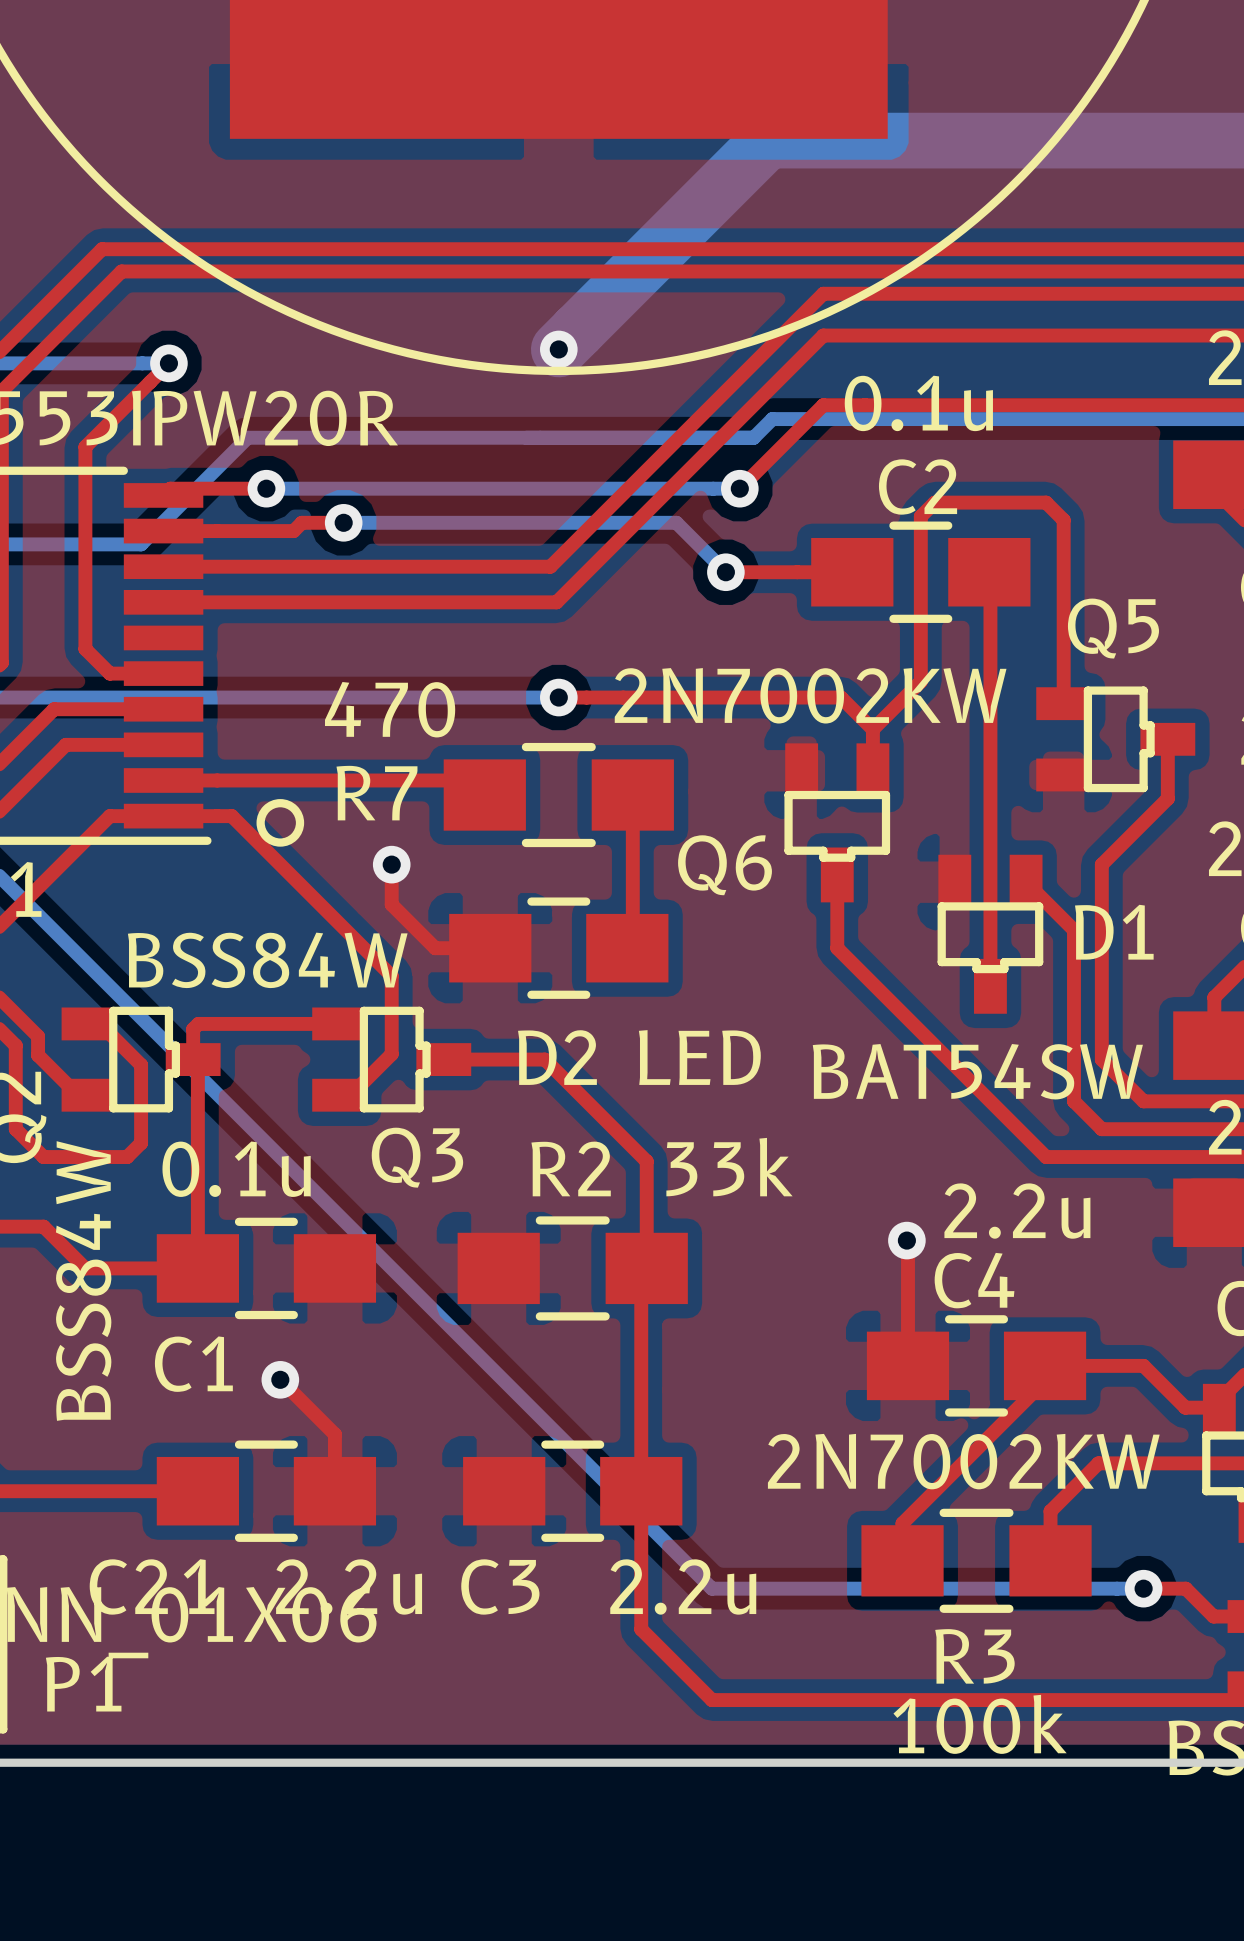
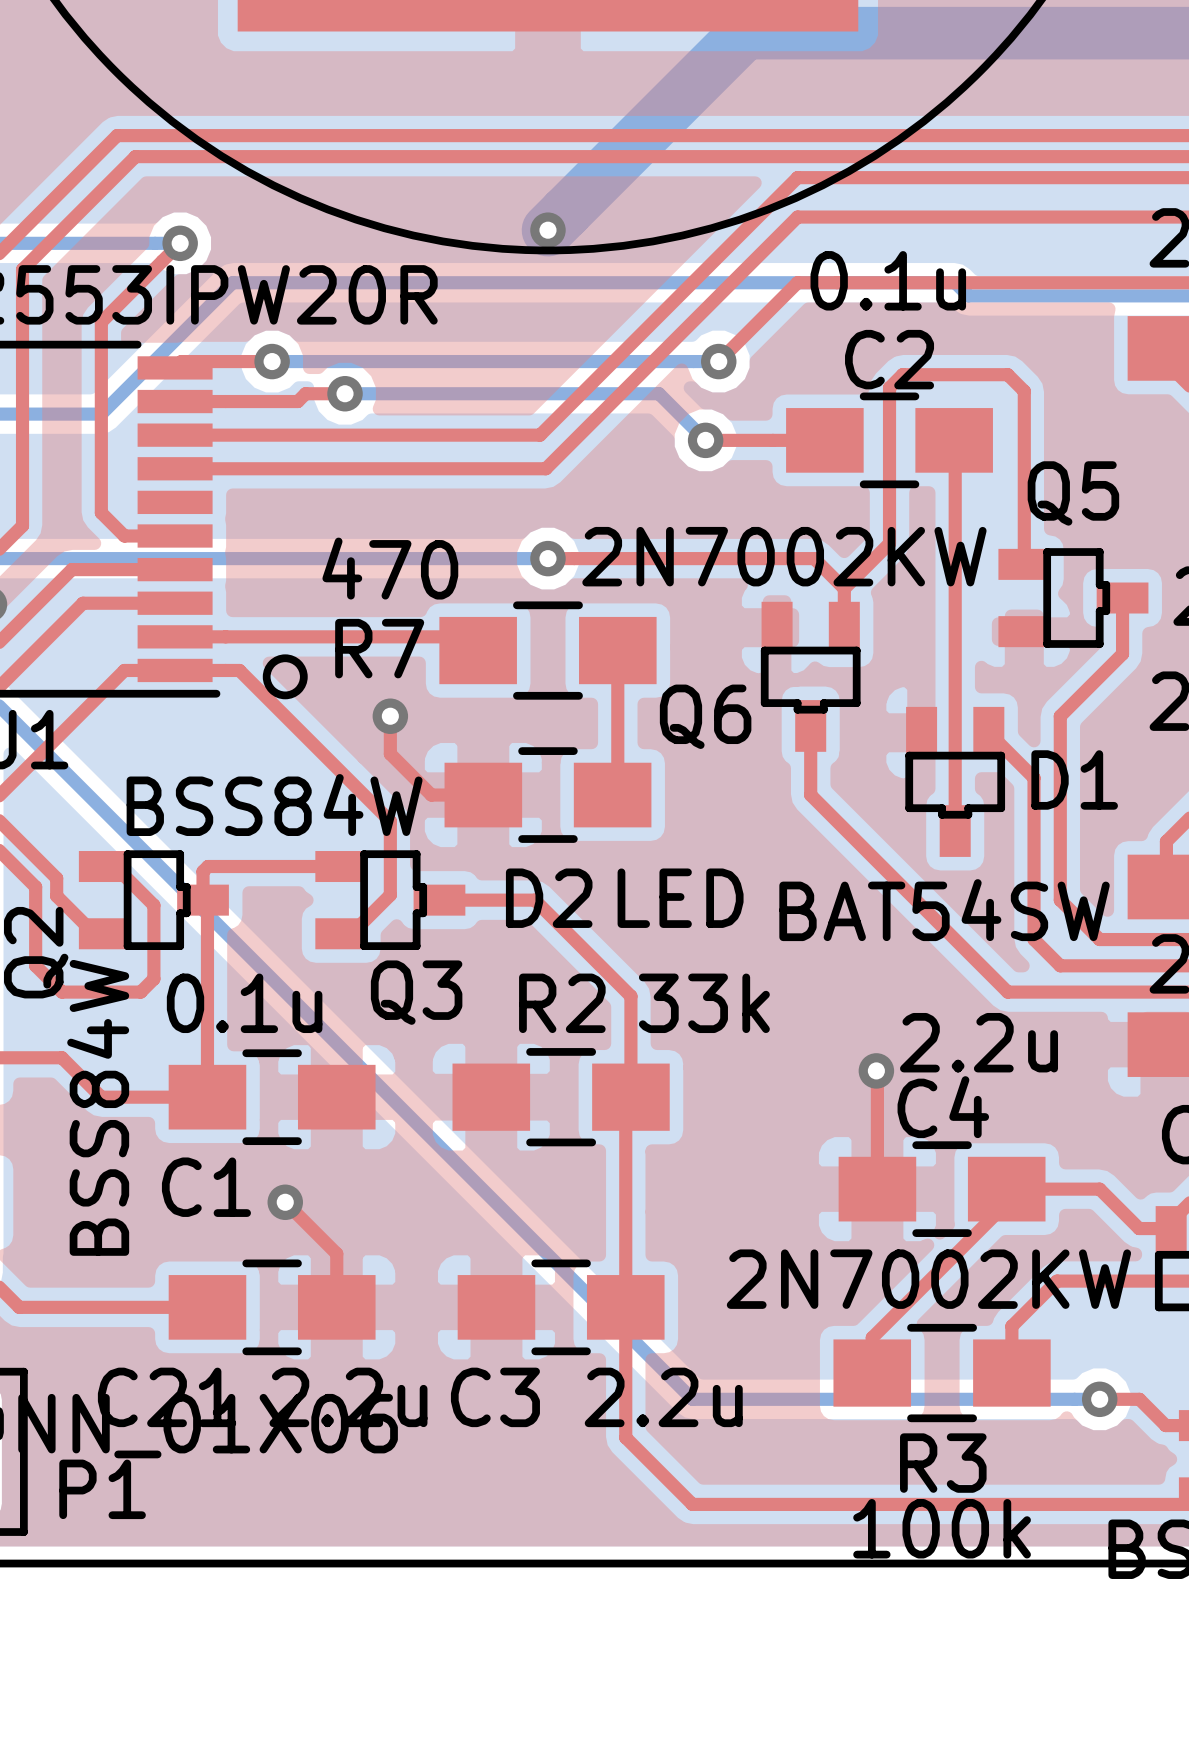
bottom track: (1004, 419) (772, 419) (753, 437) (247, 437) (141, 544) (85, 544) -> (968, 295) (955, 282) (232, 282) (101, 414)

